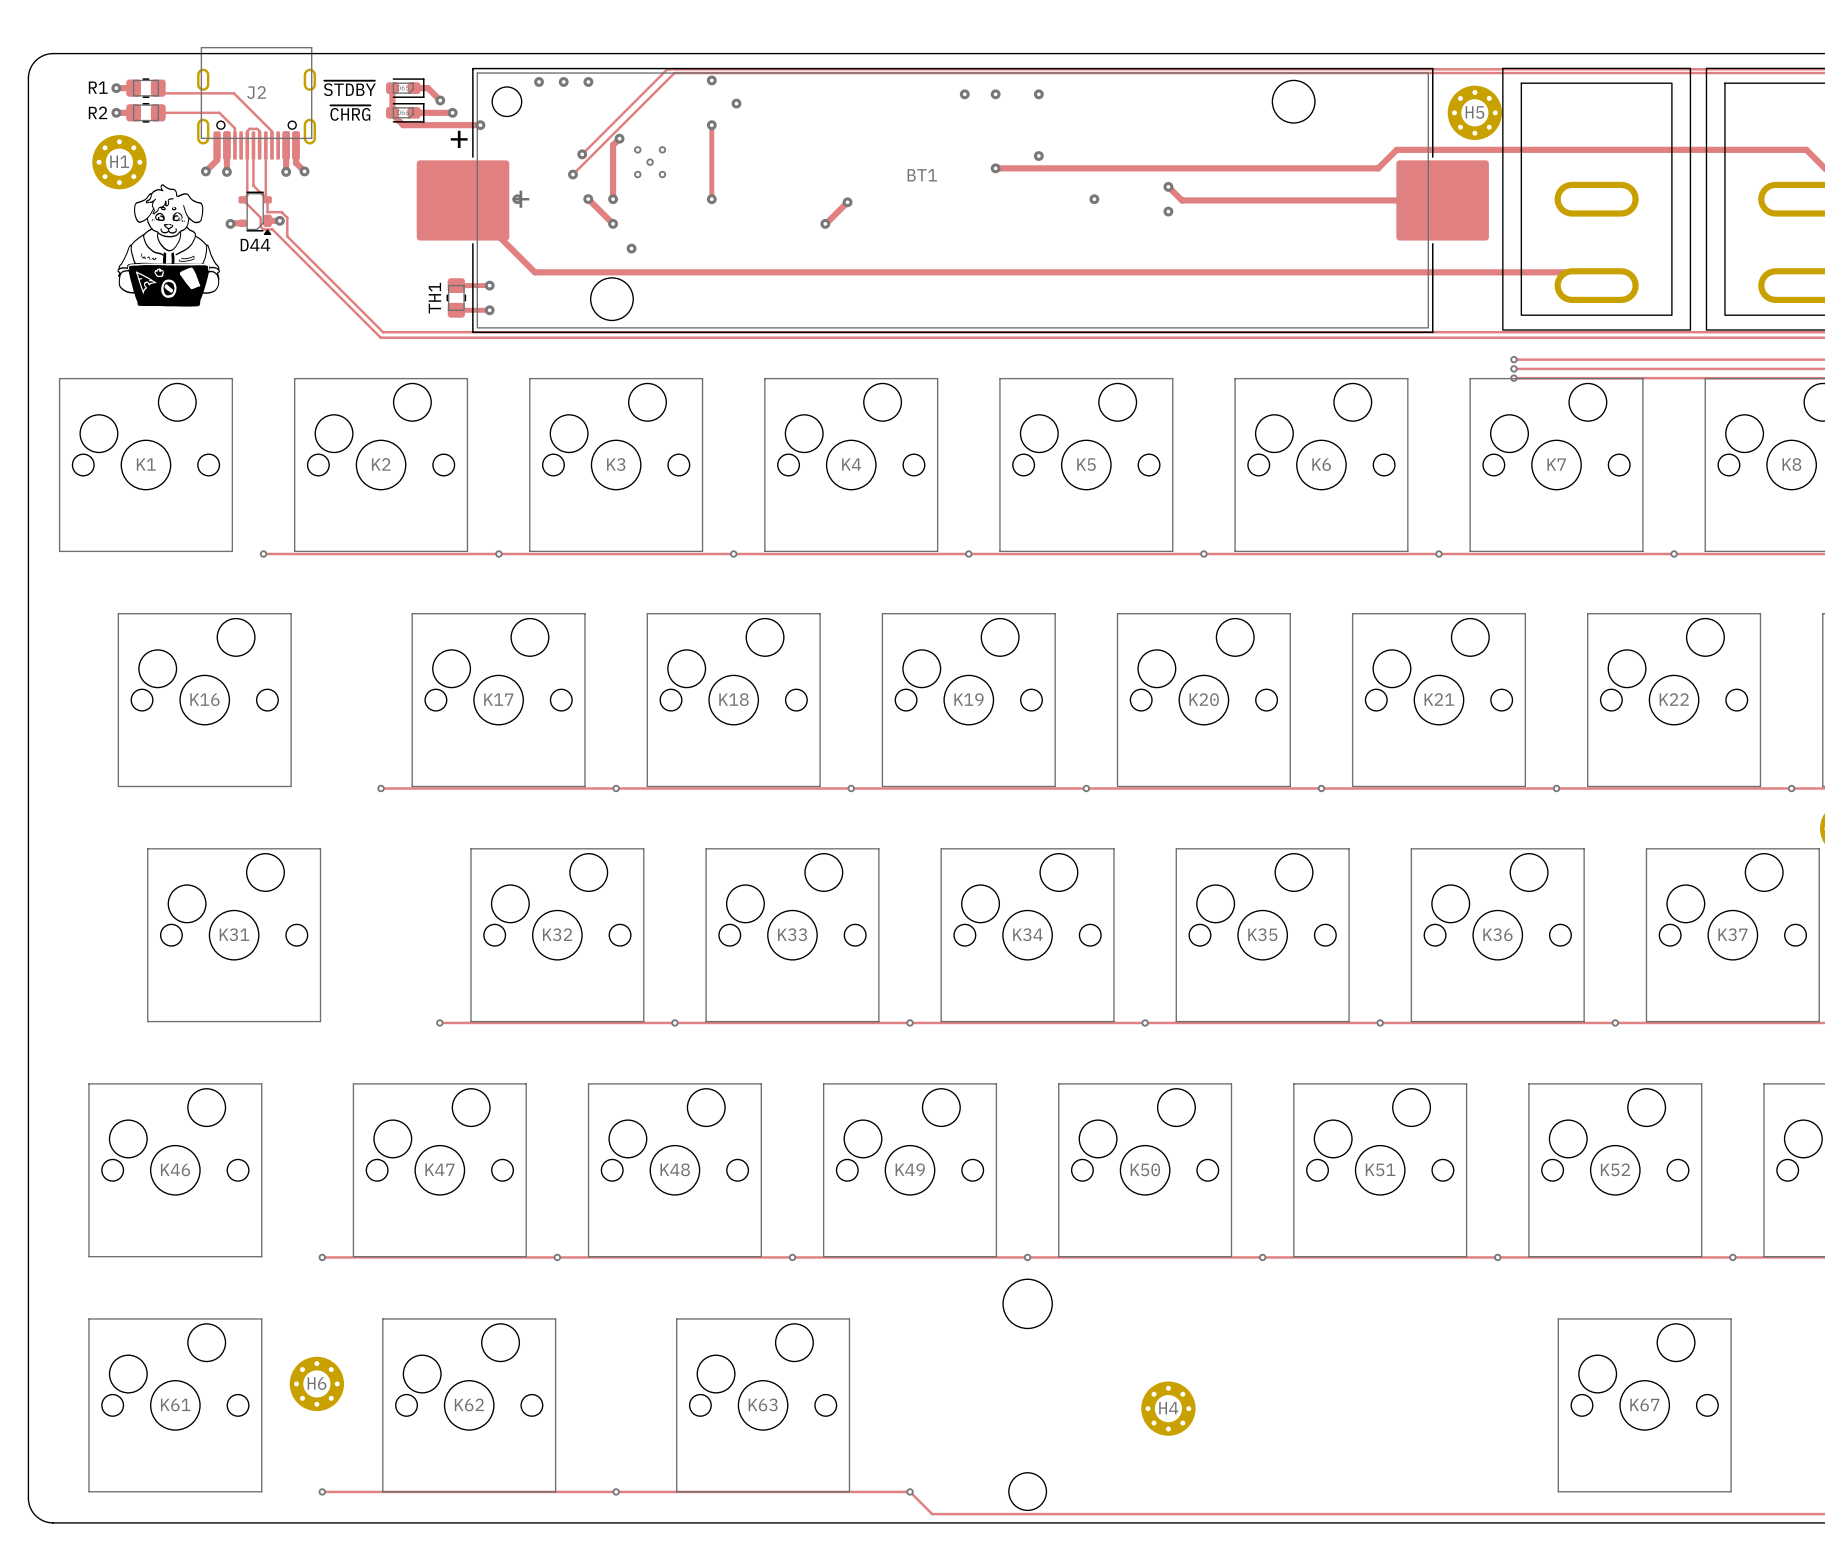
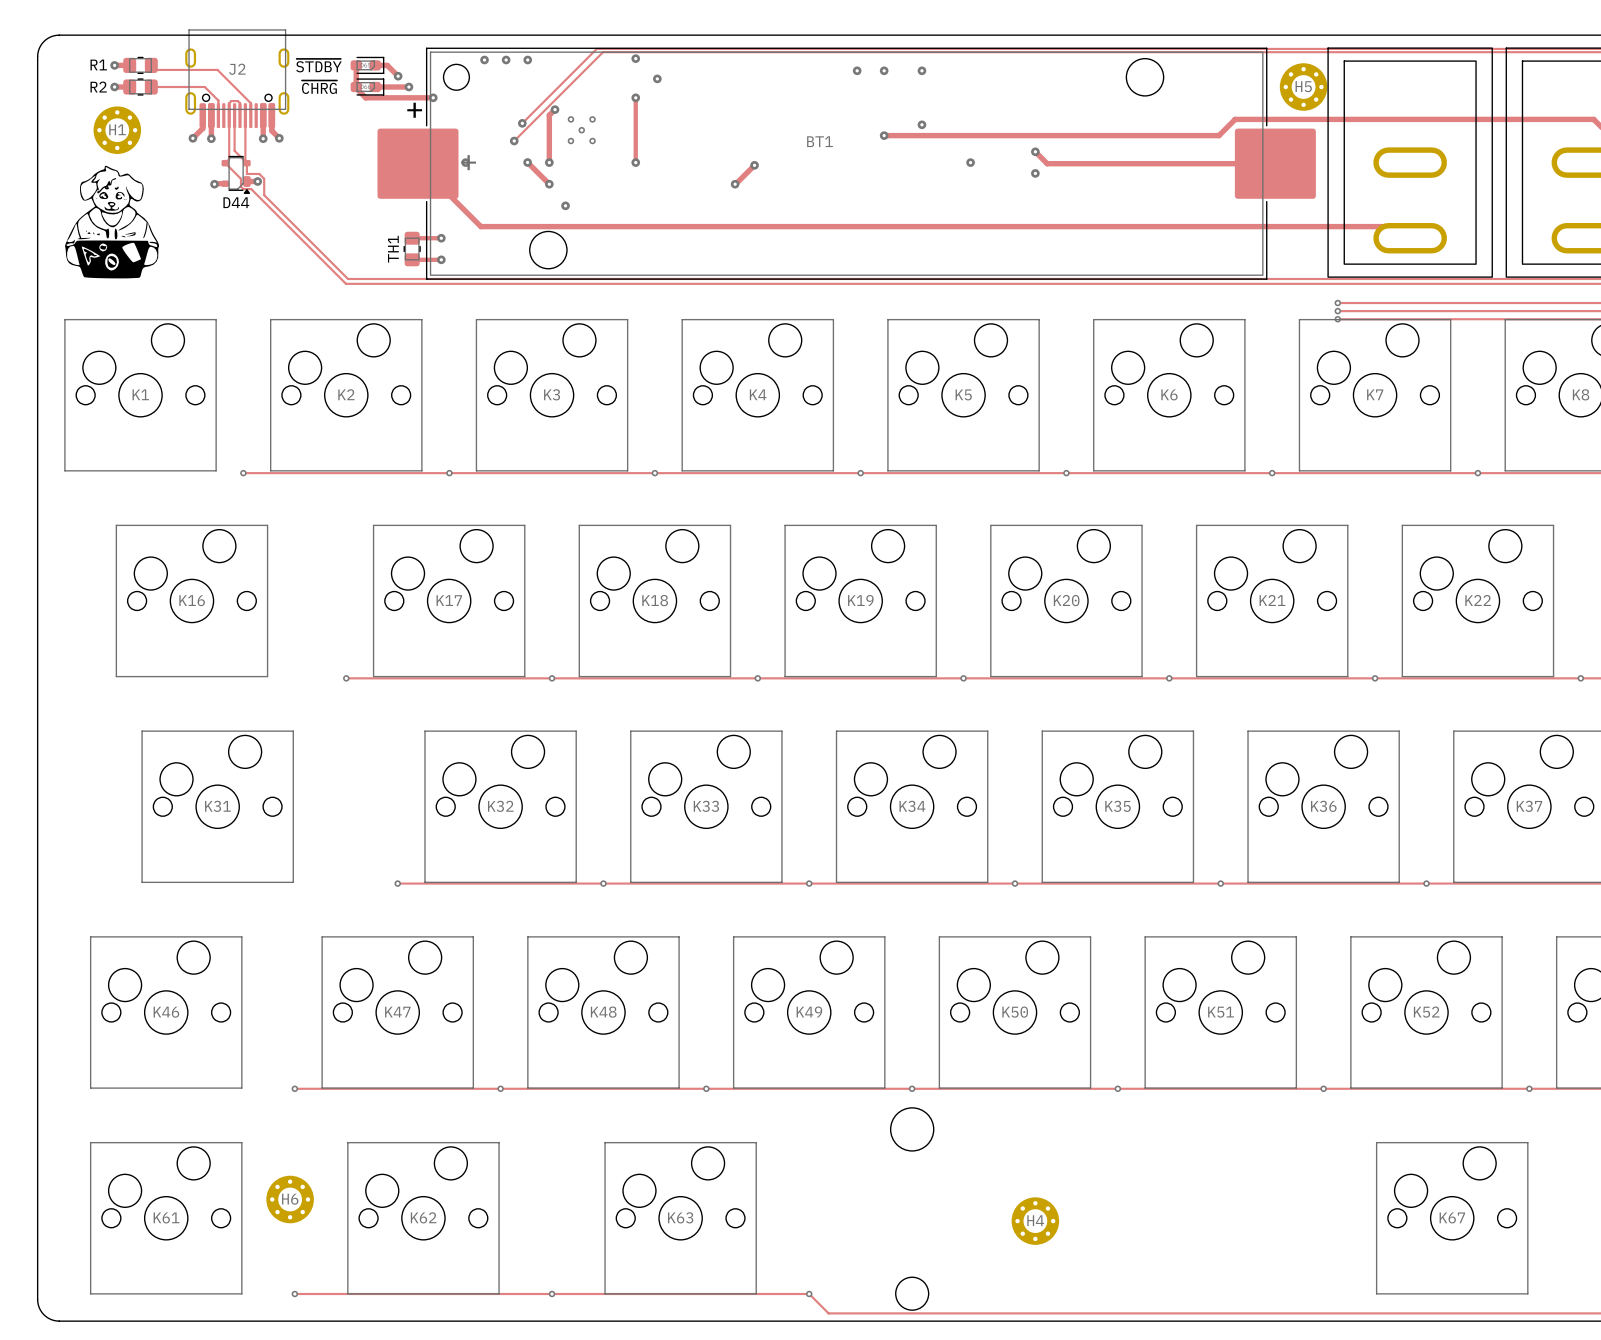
drawing: [117, 184, 221, 307] -> none
drawing: none -> [65, 165, 160, 279]

